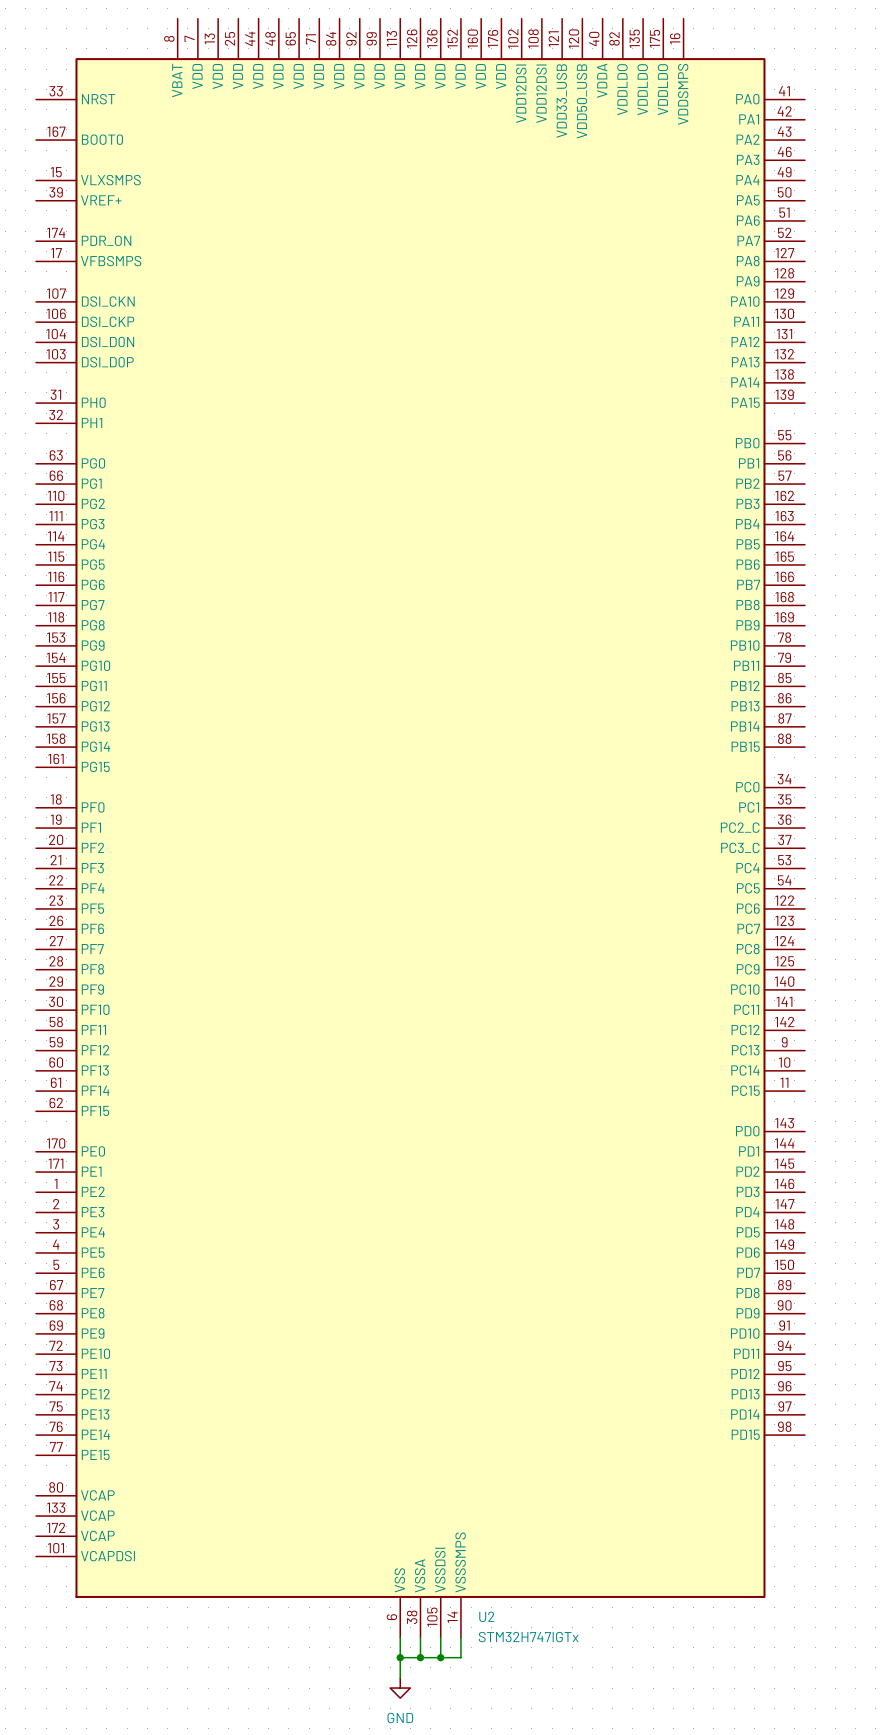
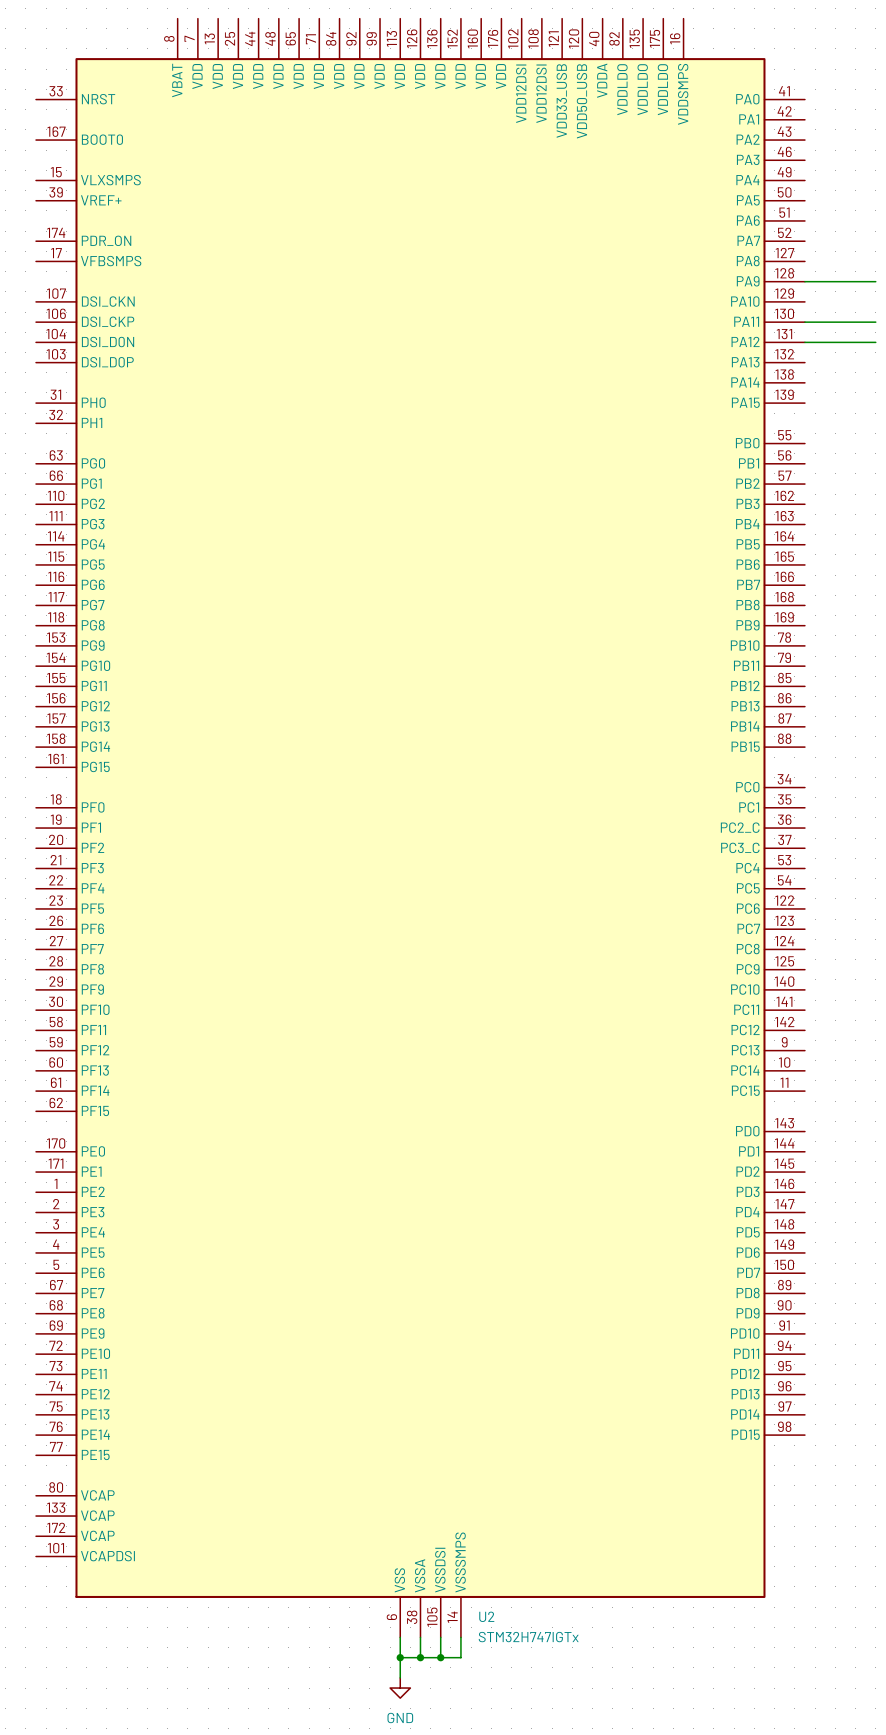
wire: none -> (804, 281) (875, 281)
wire: none -> (804, 322) (875, 322)
wire: none -> (804, 342) (875, 342)

